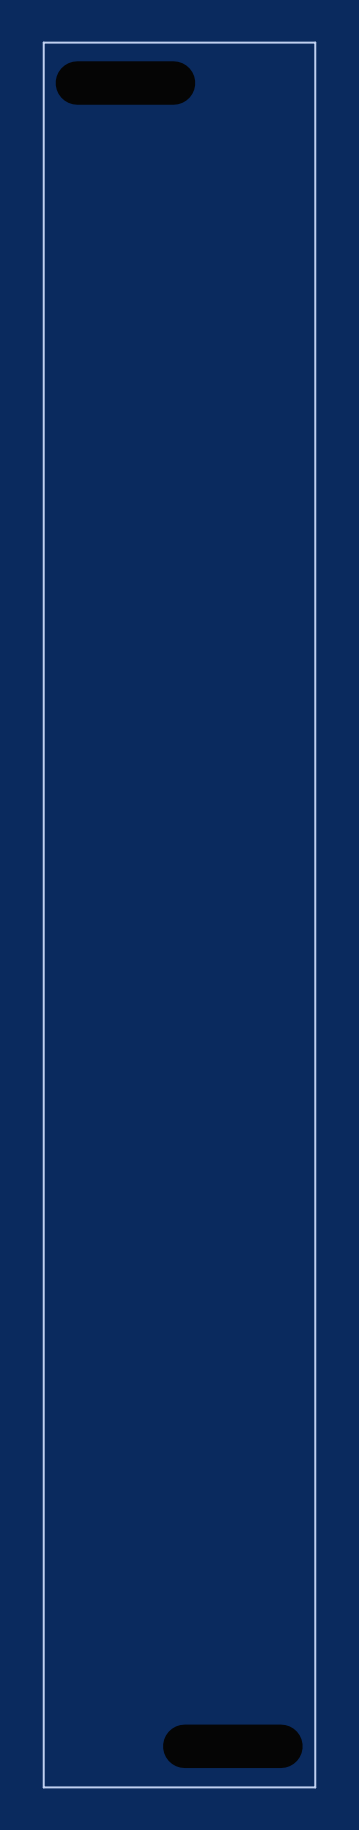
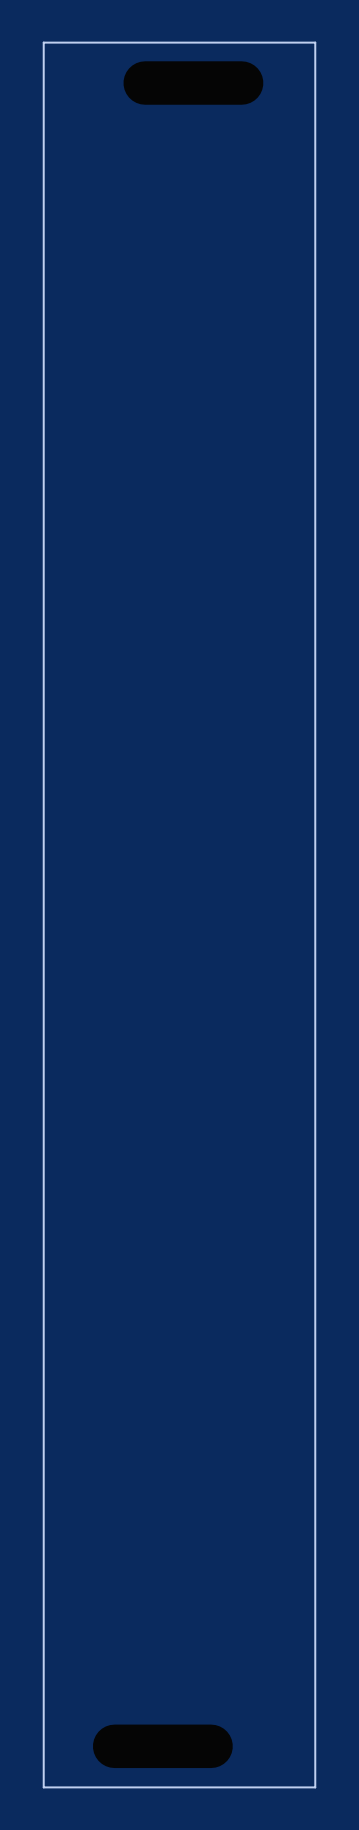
part position: (125, 83) -> (193, 83)
part position: (232, 1746) -> (162, 1746)

